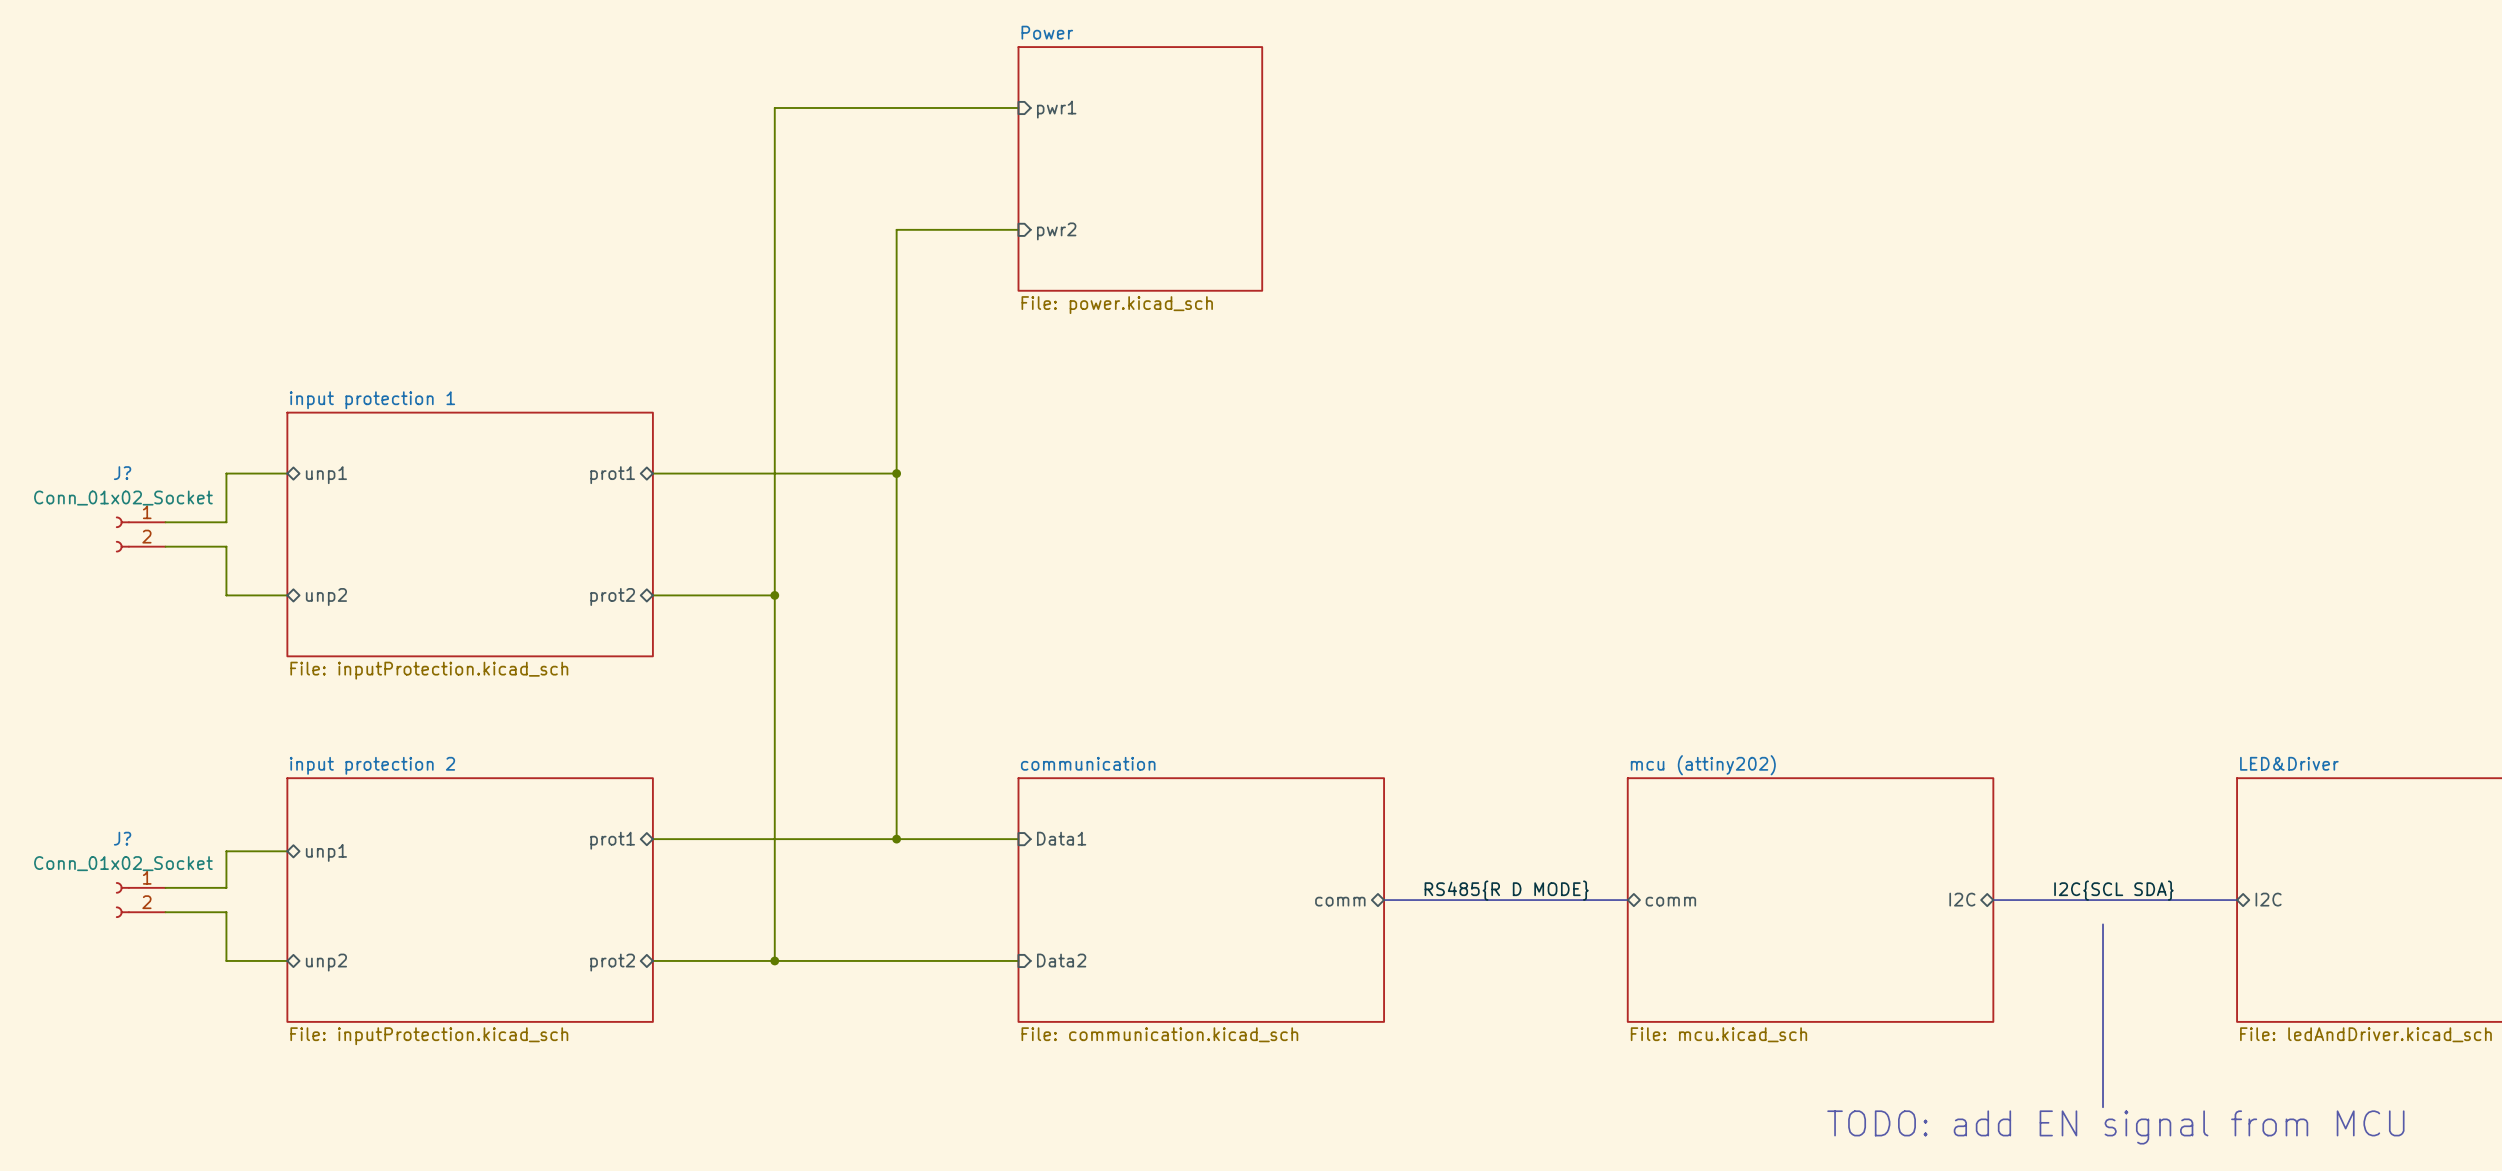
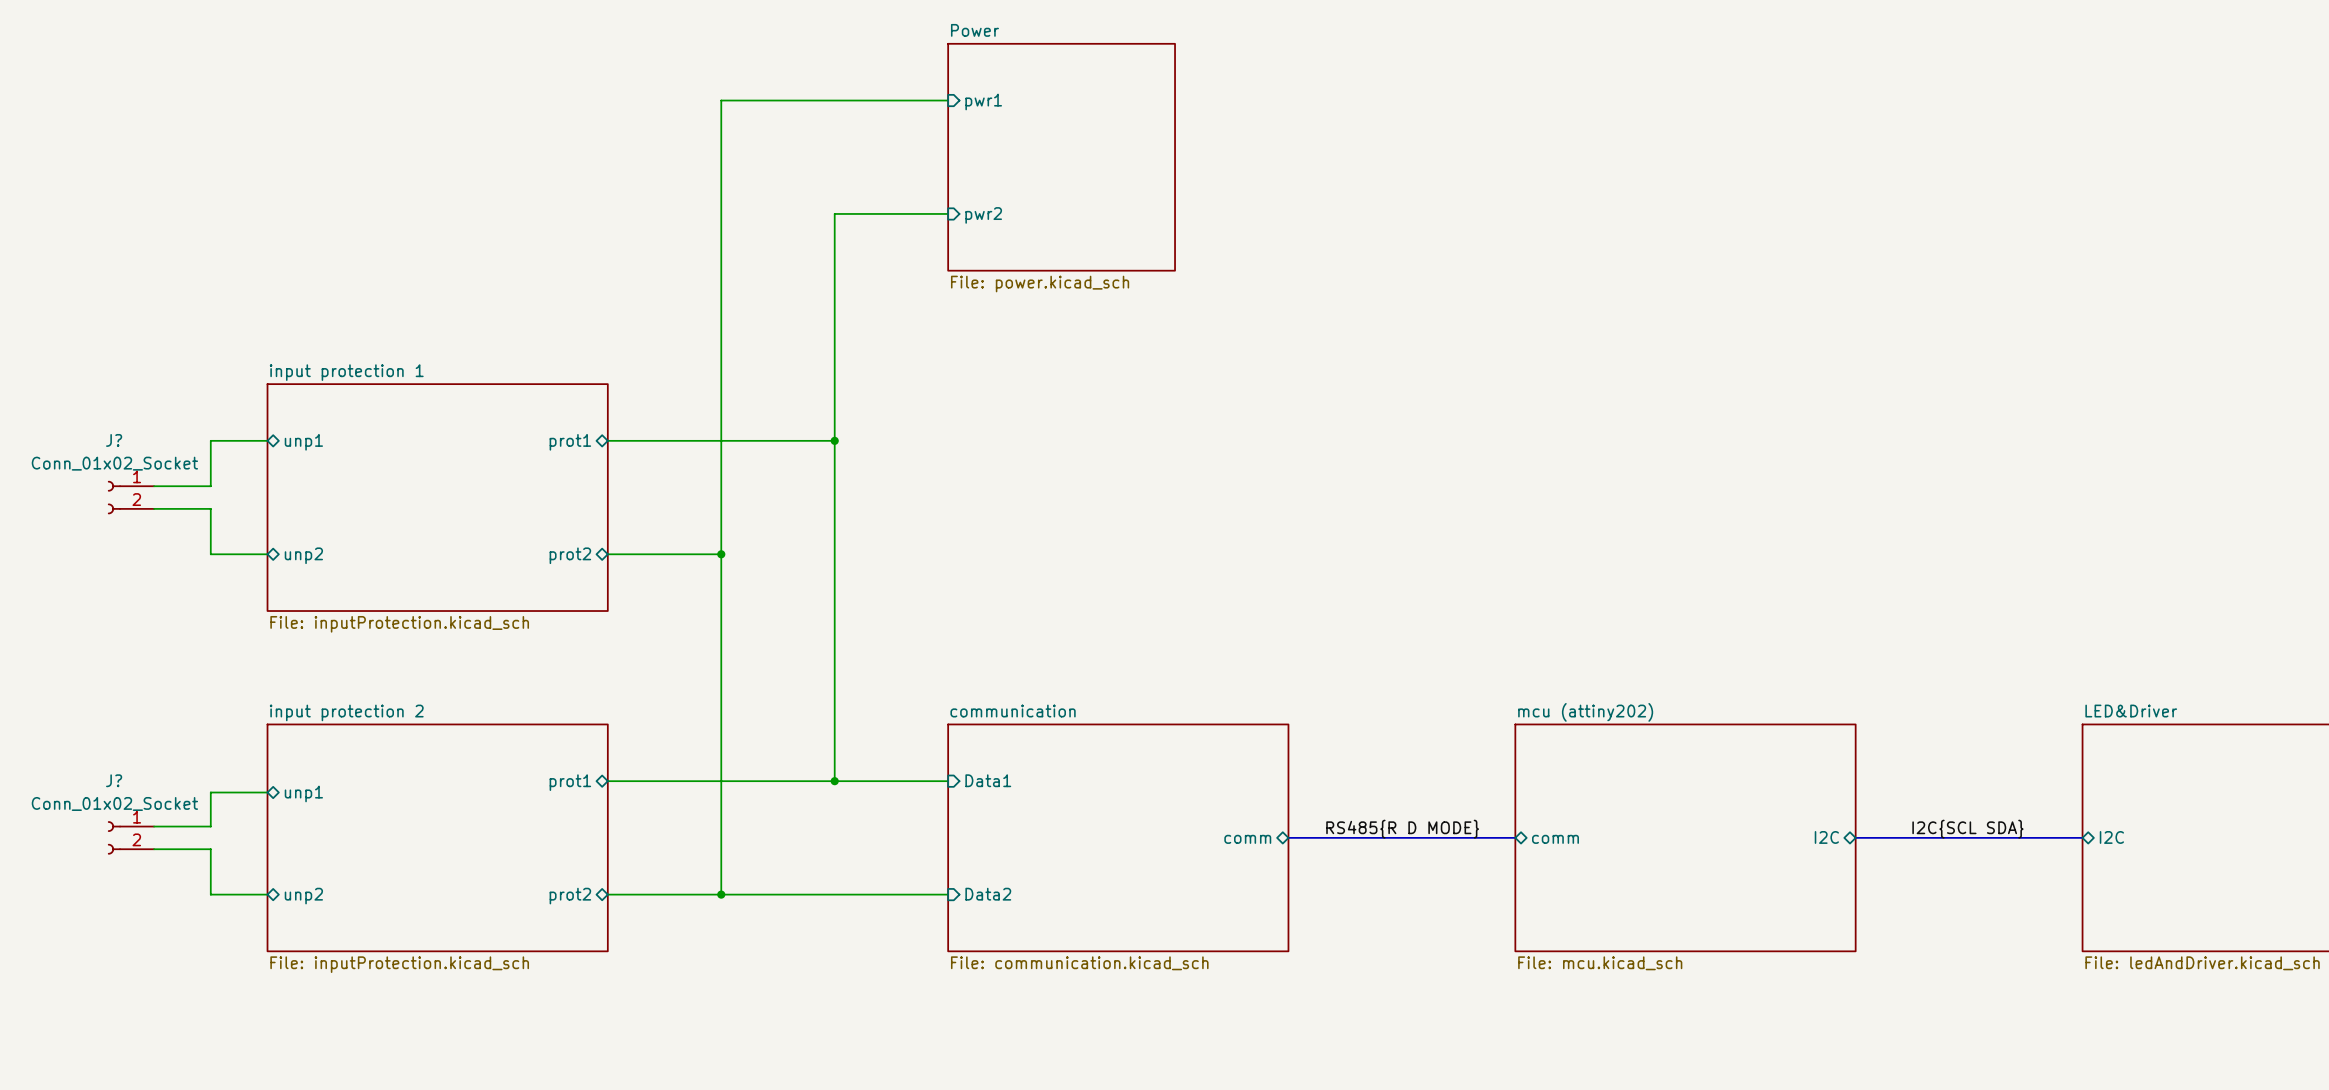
line: (2103, 924) (2103, 1107) -> none
text: TODO: add EN signal from MCU (2115, 1127) -> none

